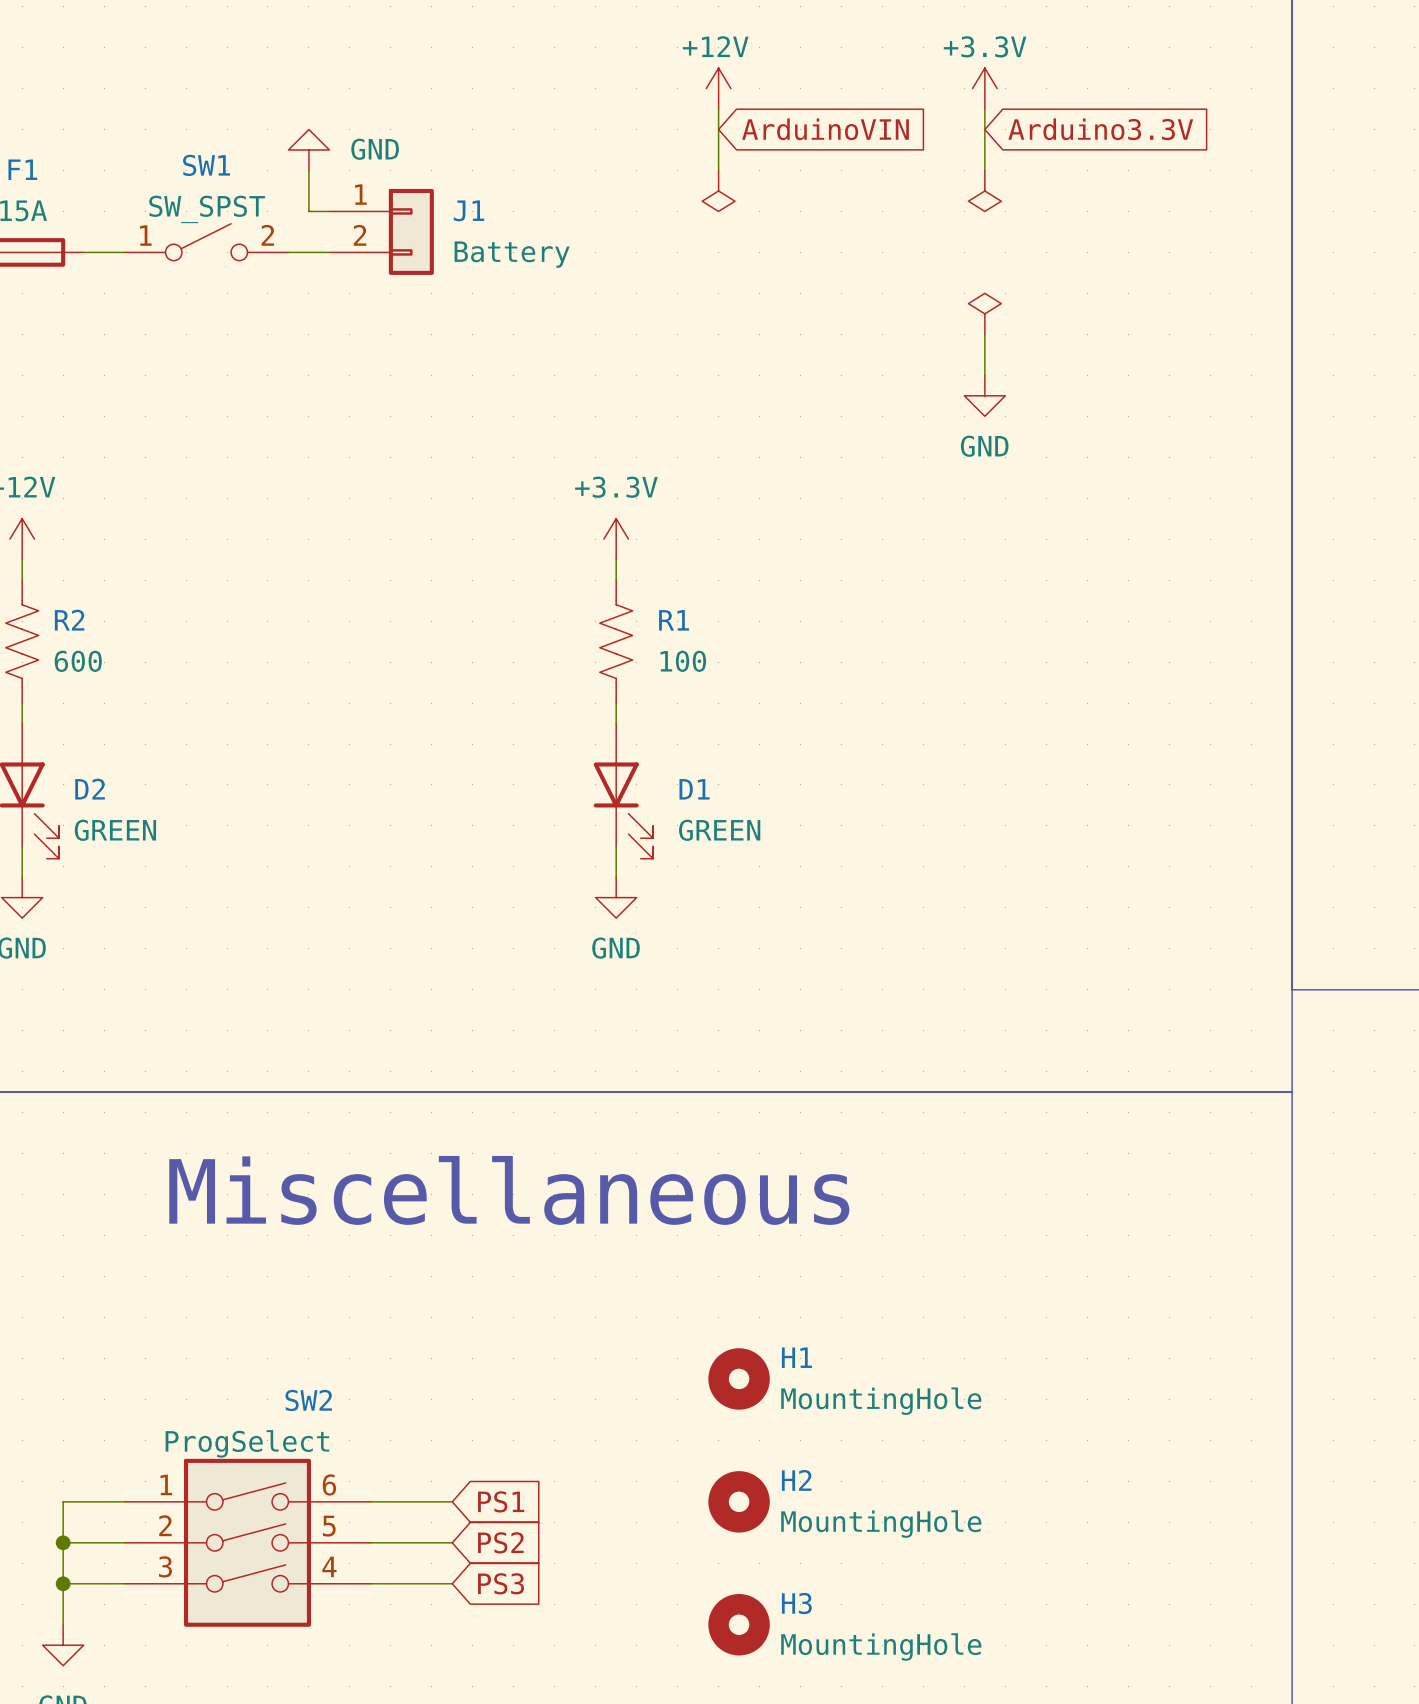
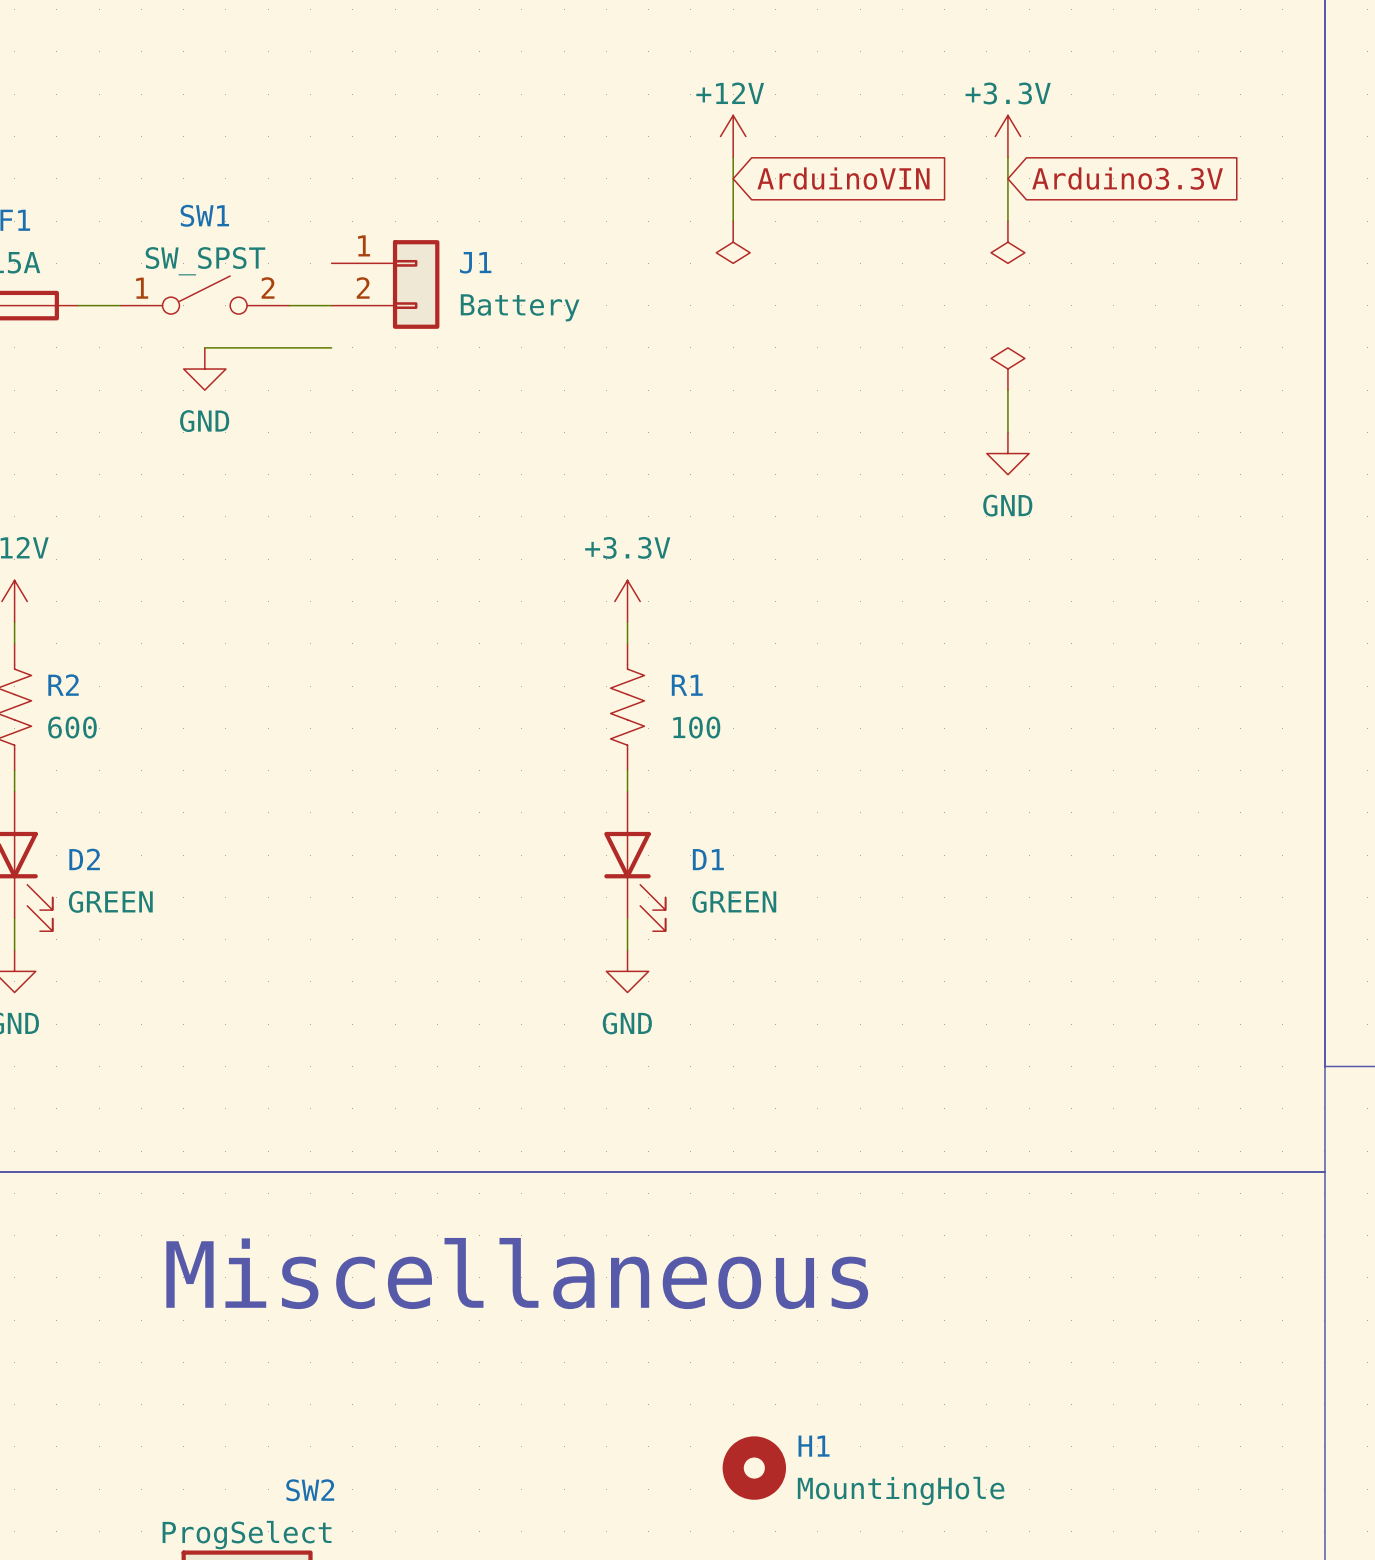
power symbol text position: GND (375, 149) -> GND (204, 421)
power symbol rotation: 0° (308, 150) -> 180° (204, 369)
power symbol position: GND (308, 150) -> GND (204, 369)
wire: (308, 170) (308, 211) (329, 211) -> none
wire: none -> (204, 347) (331, 347)

